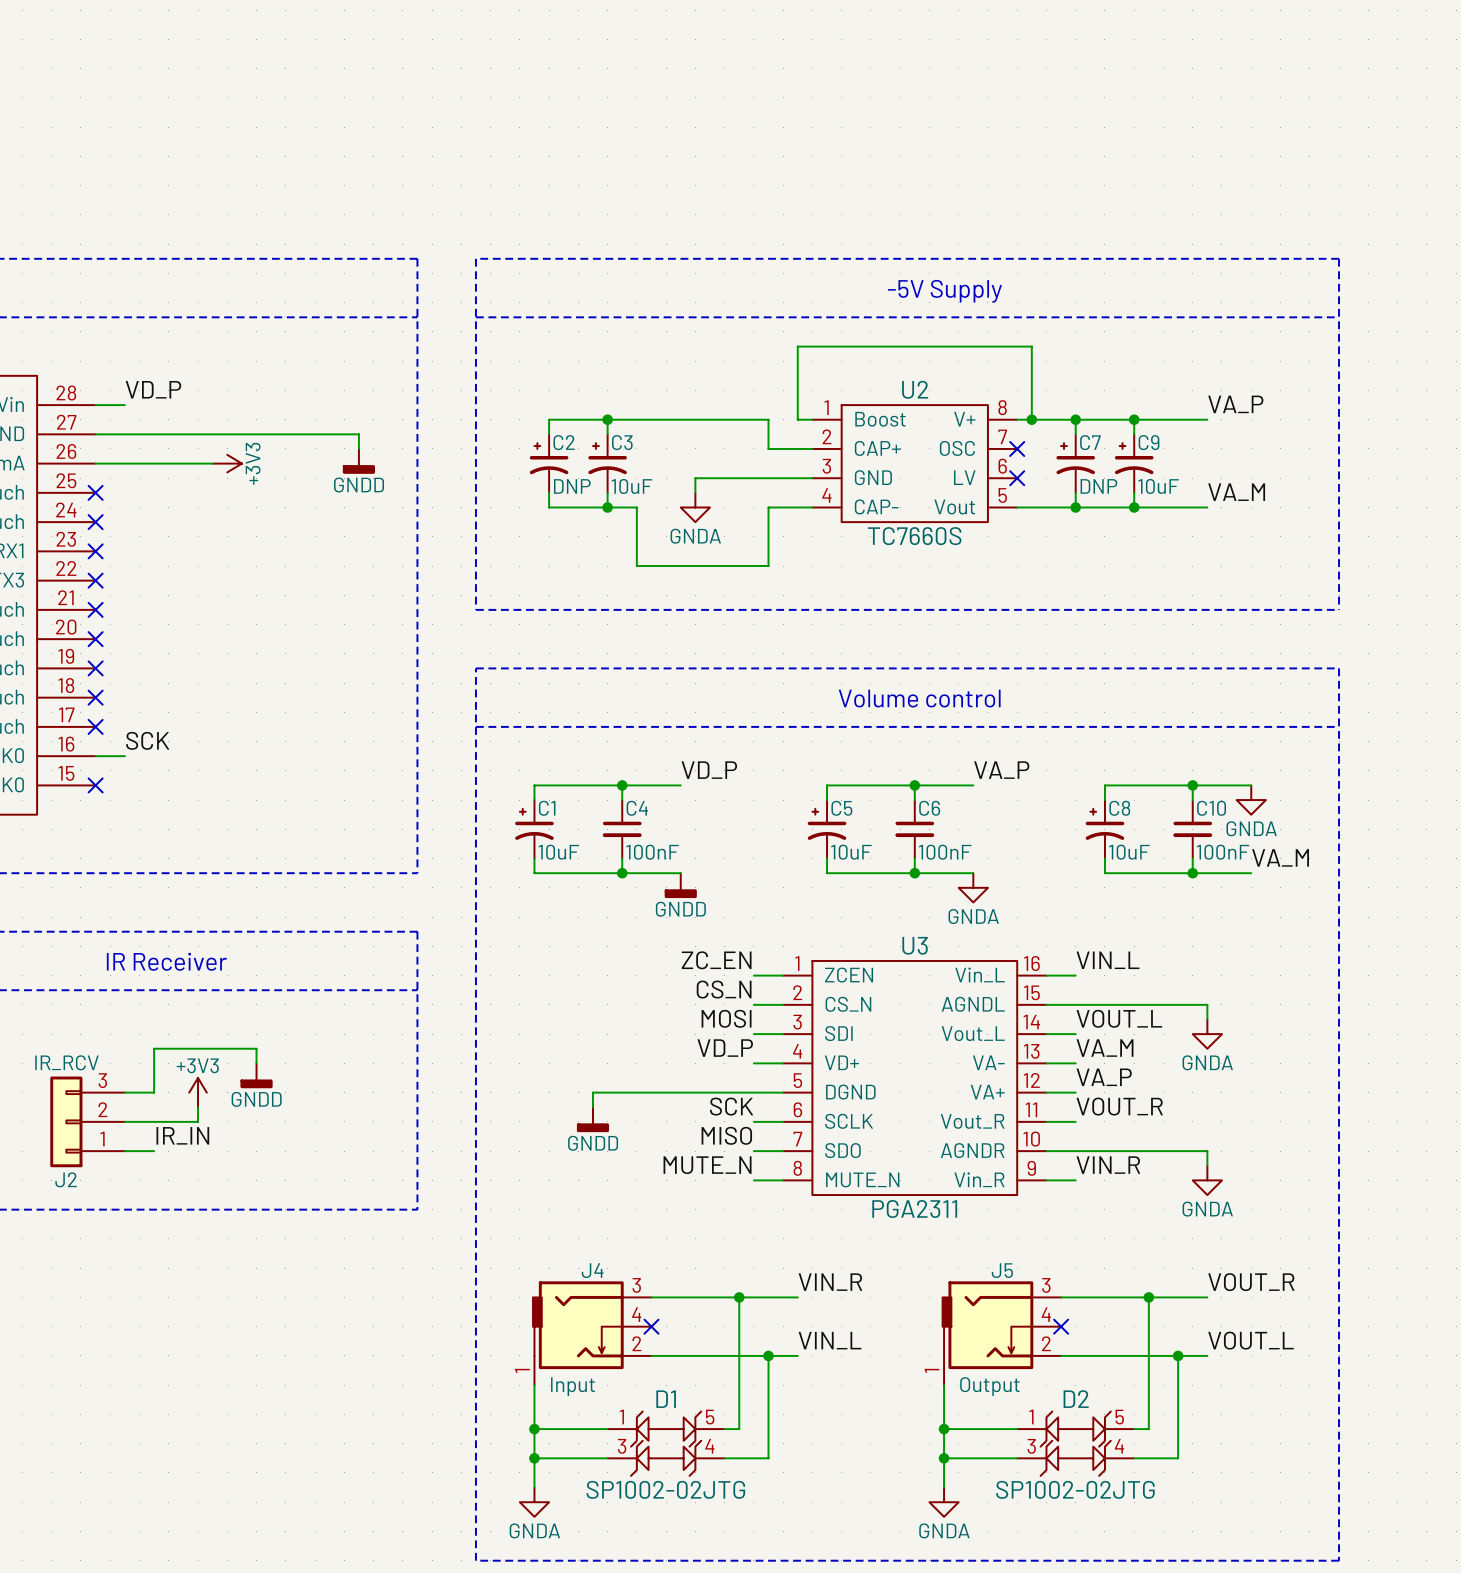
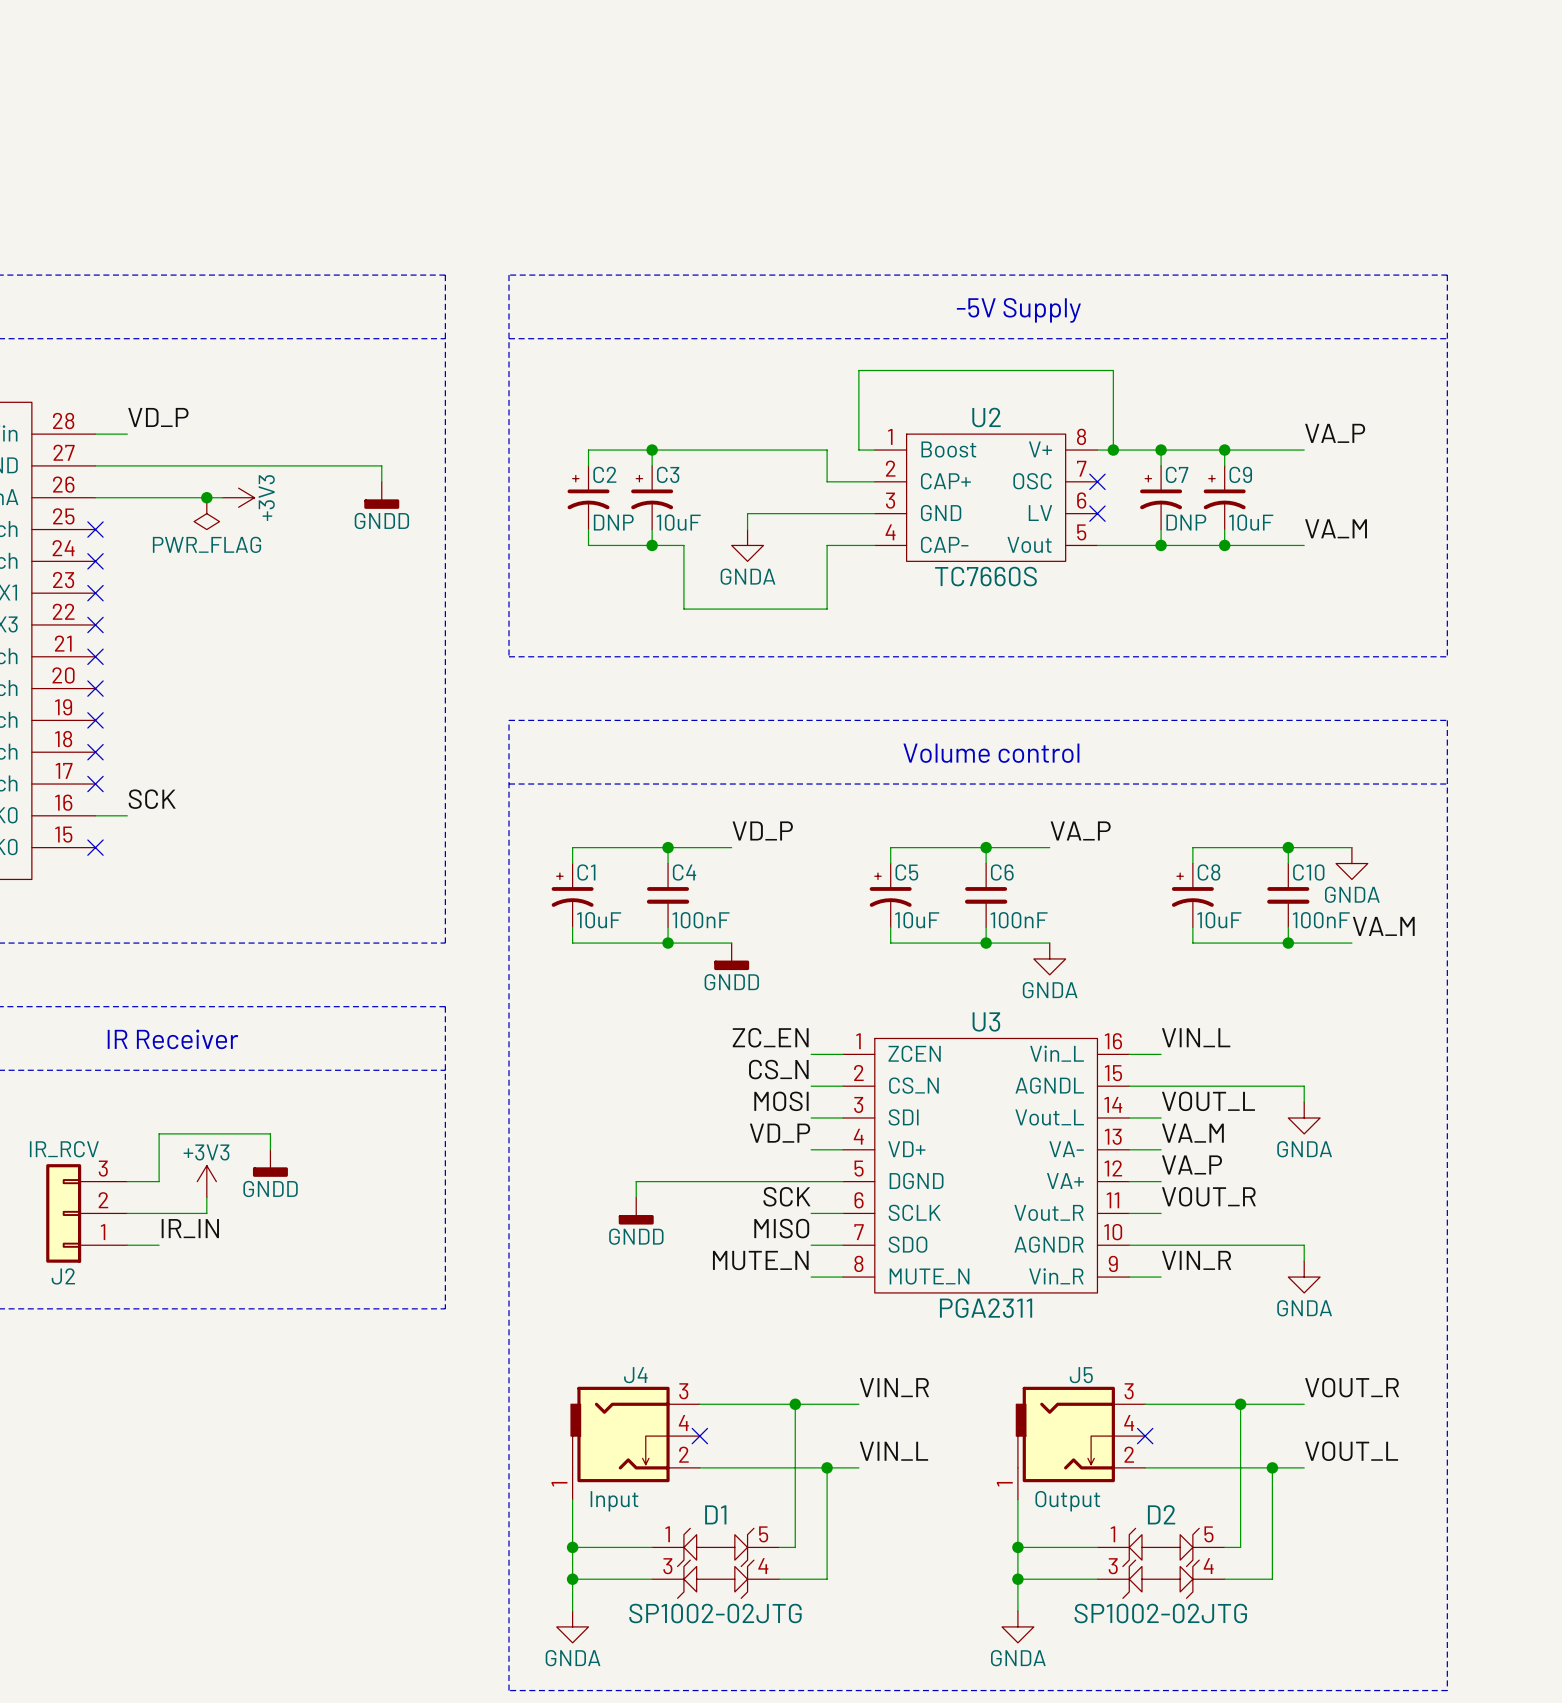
junction: none -> (206, 497)
power symbol: none -> PWR_FLAG (206, 513)

